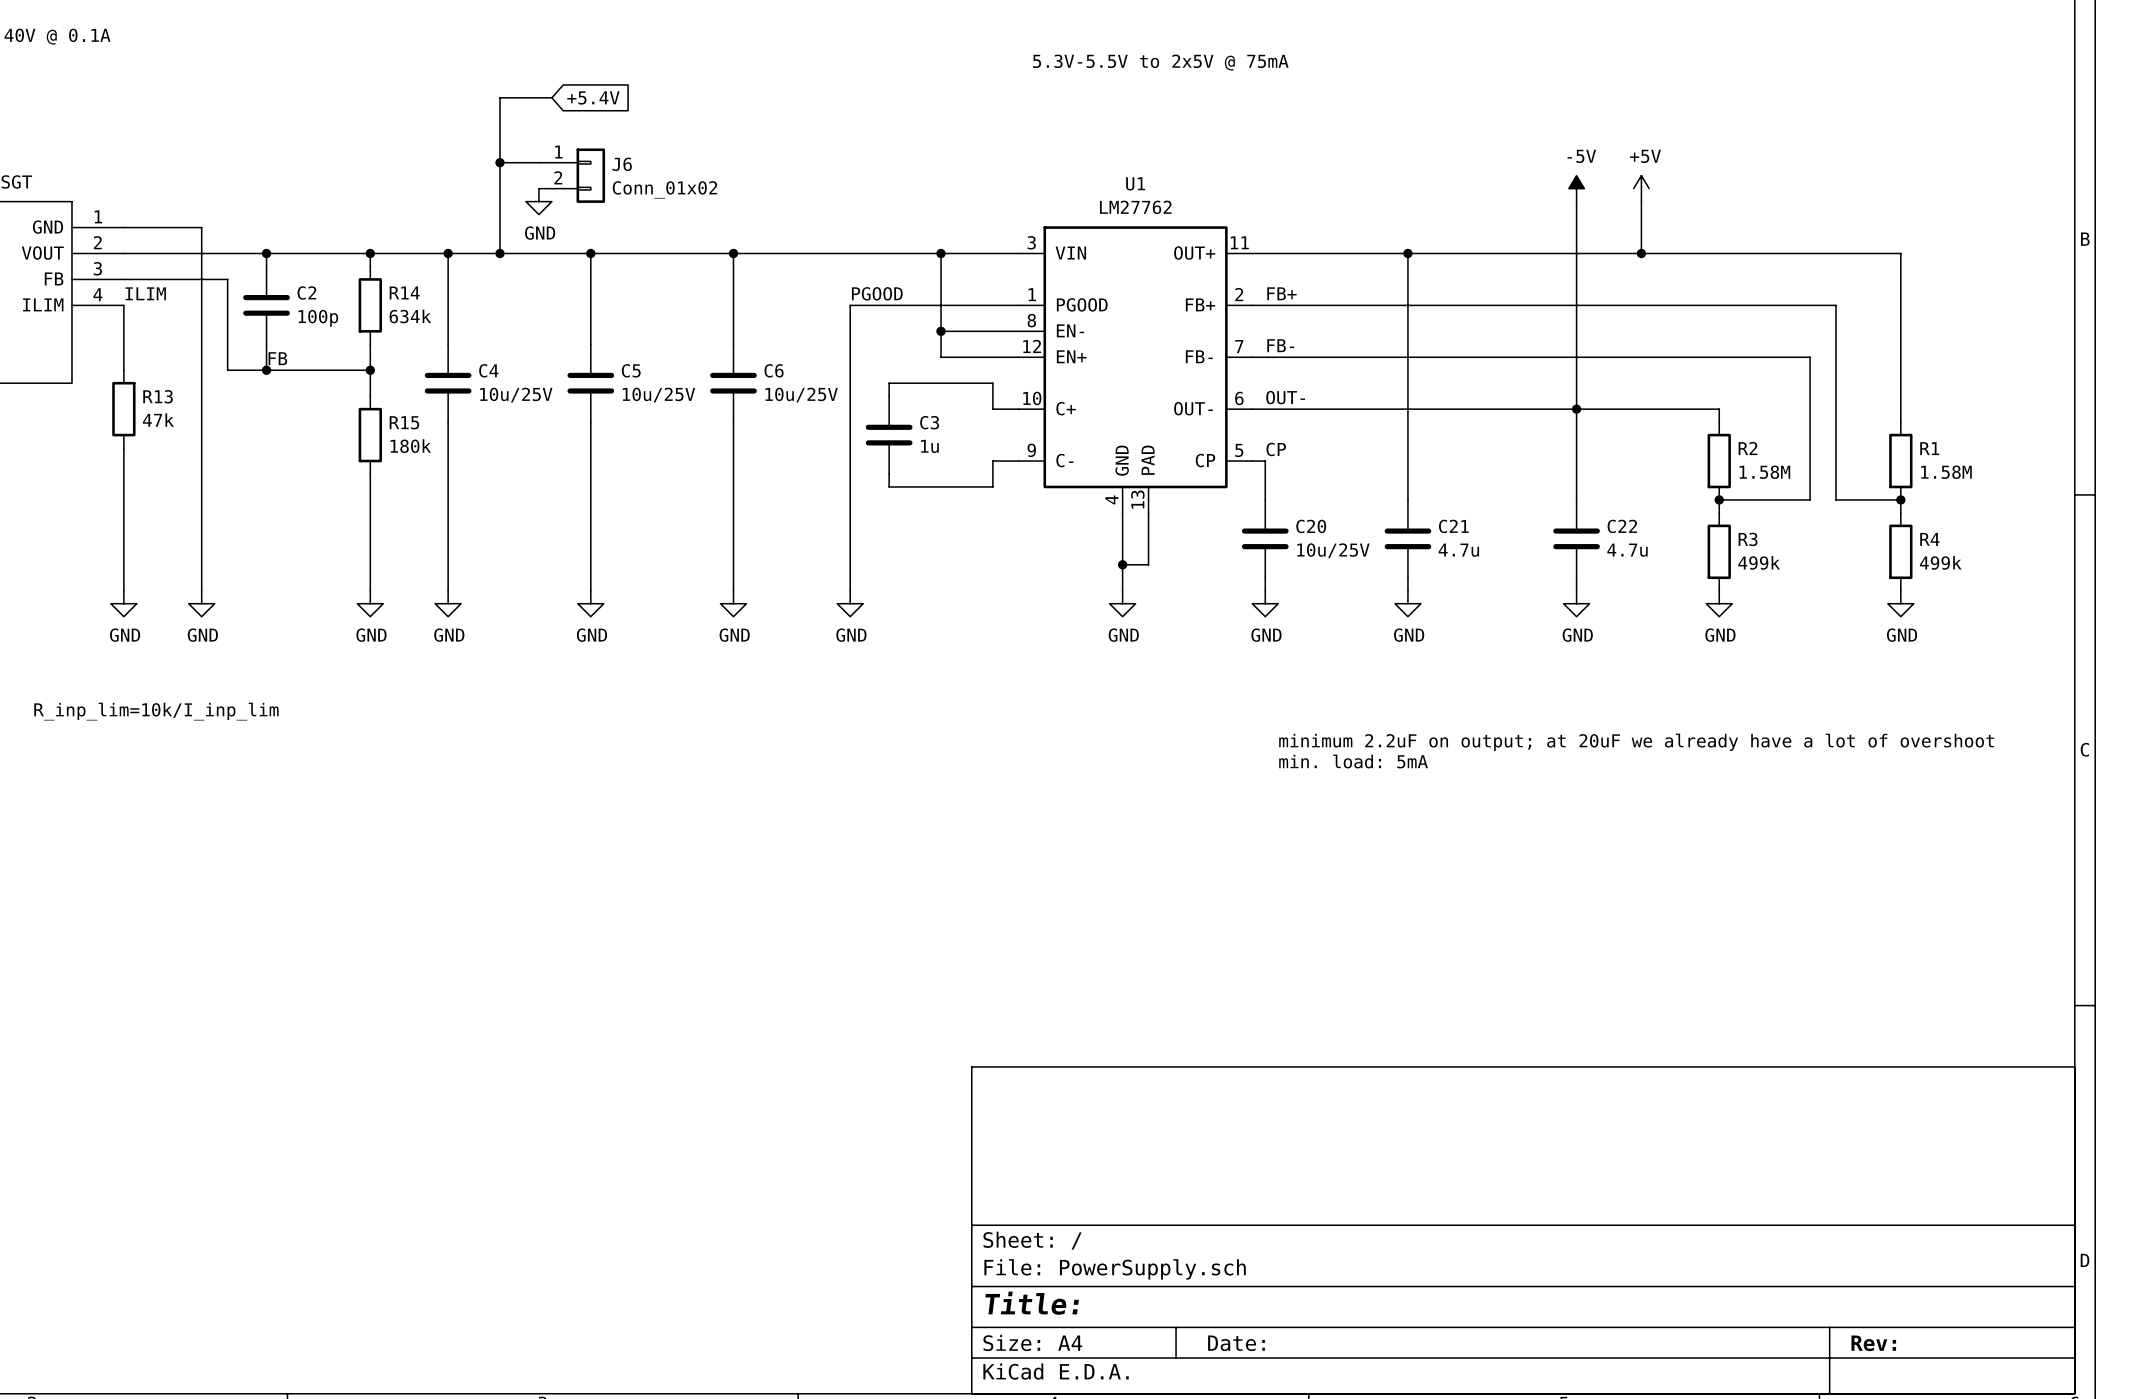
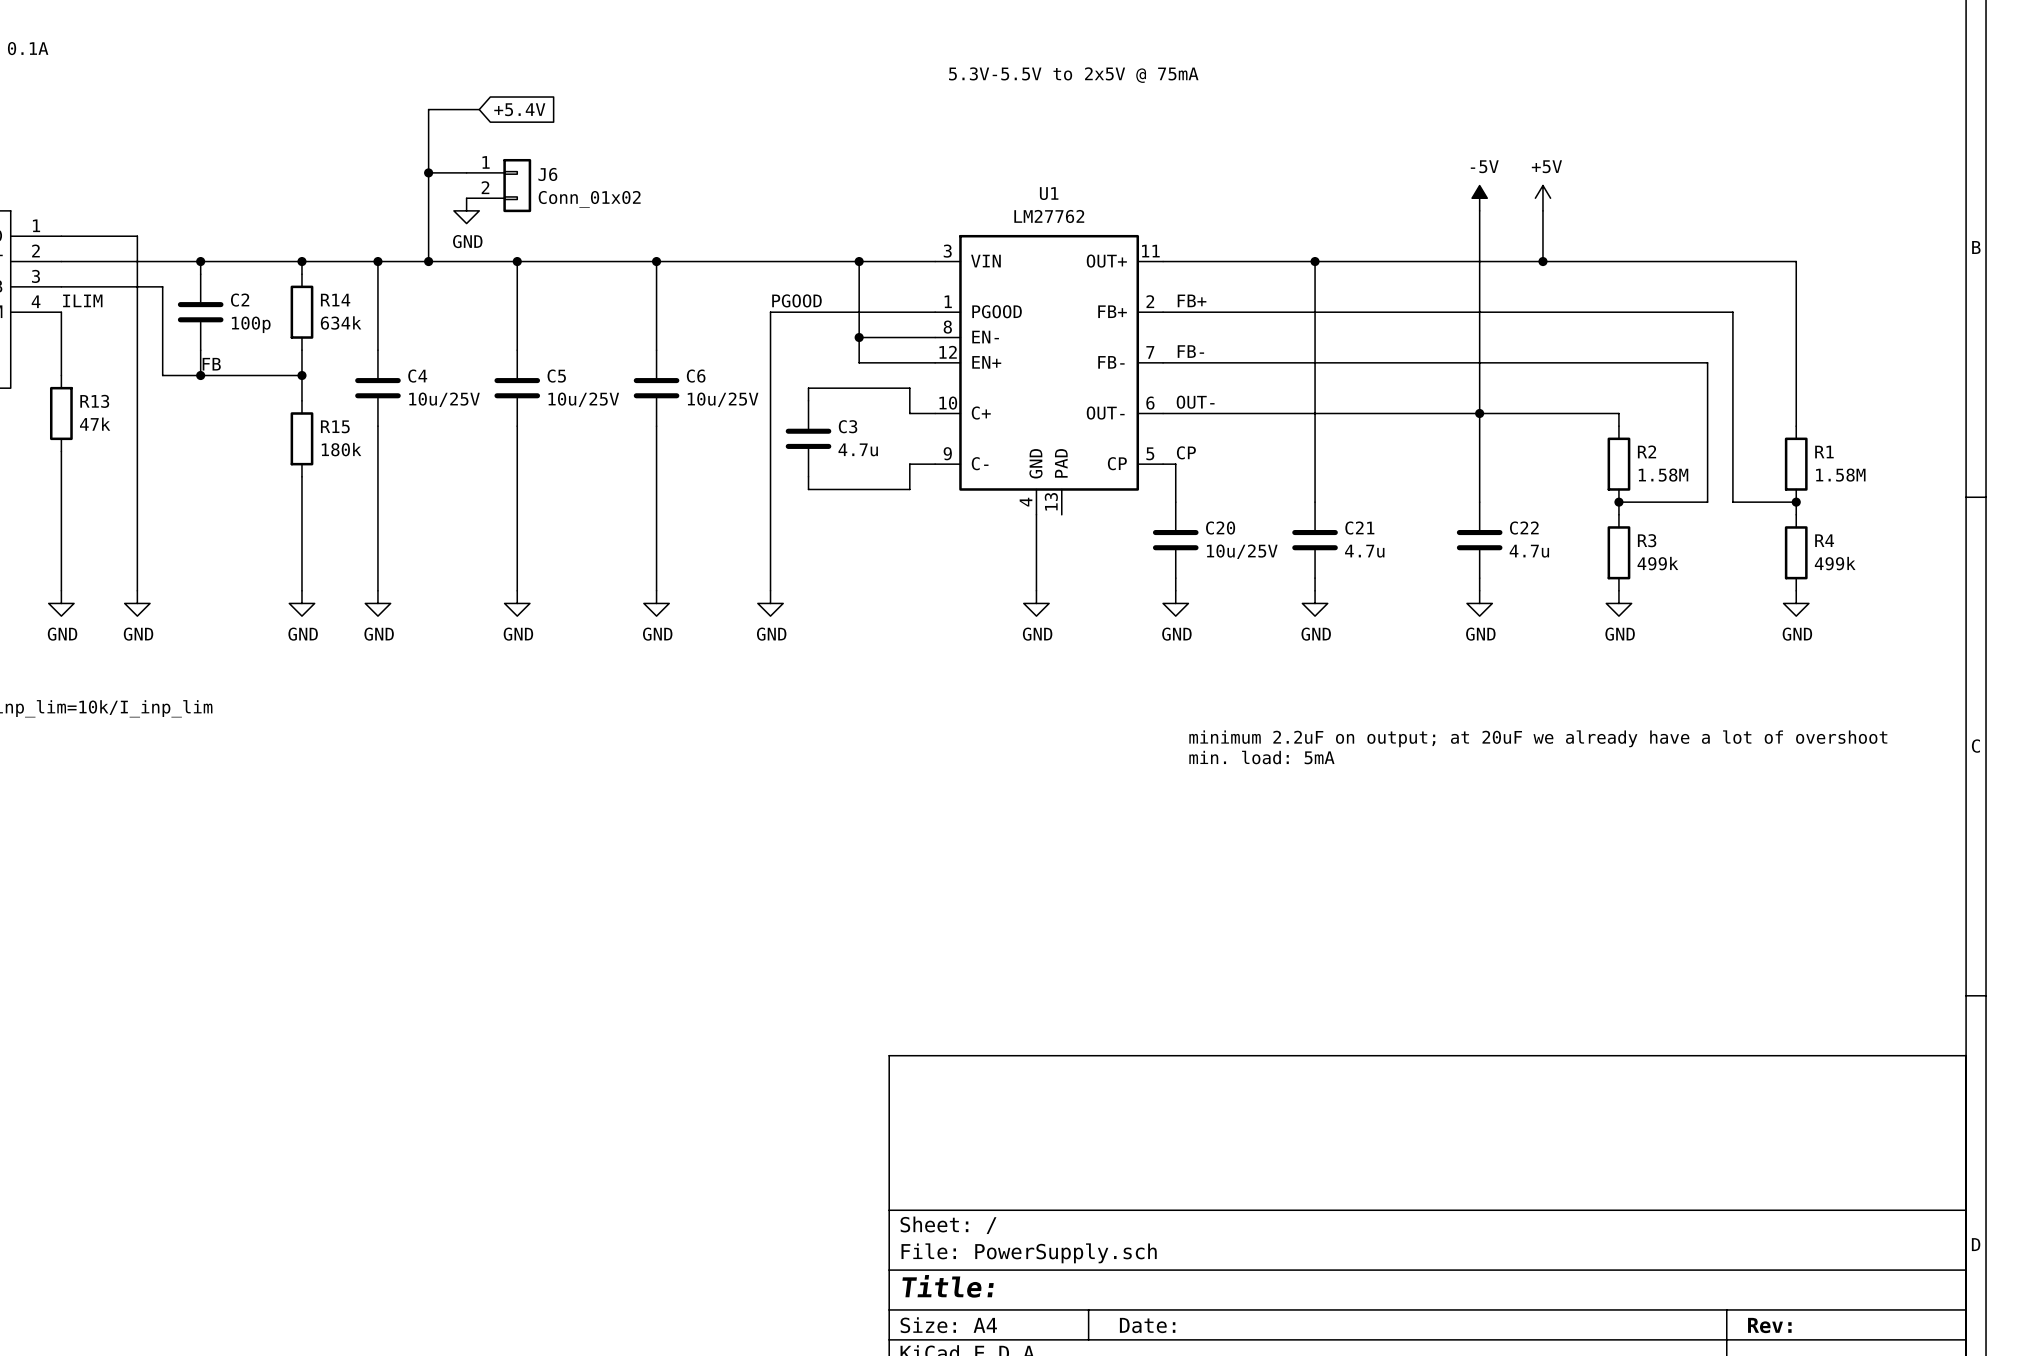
C3 value: 1u (929, 446) -> 4.7u (858, 449)
wire: (1148, 512) (1148, 564) (1122, 564) -> none
junction: (1122, 564) -> none

